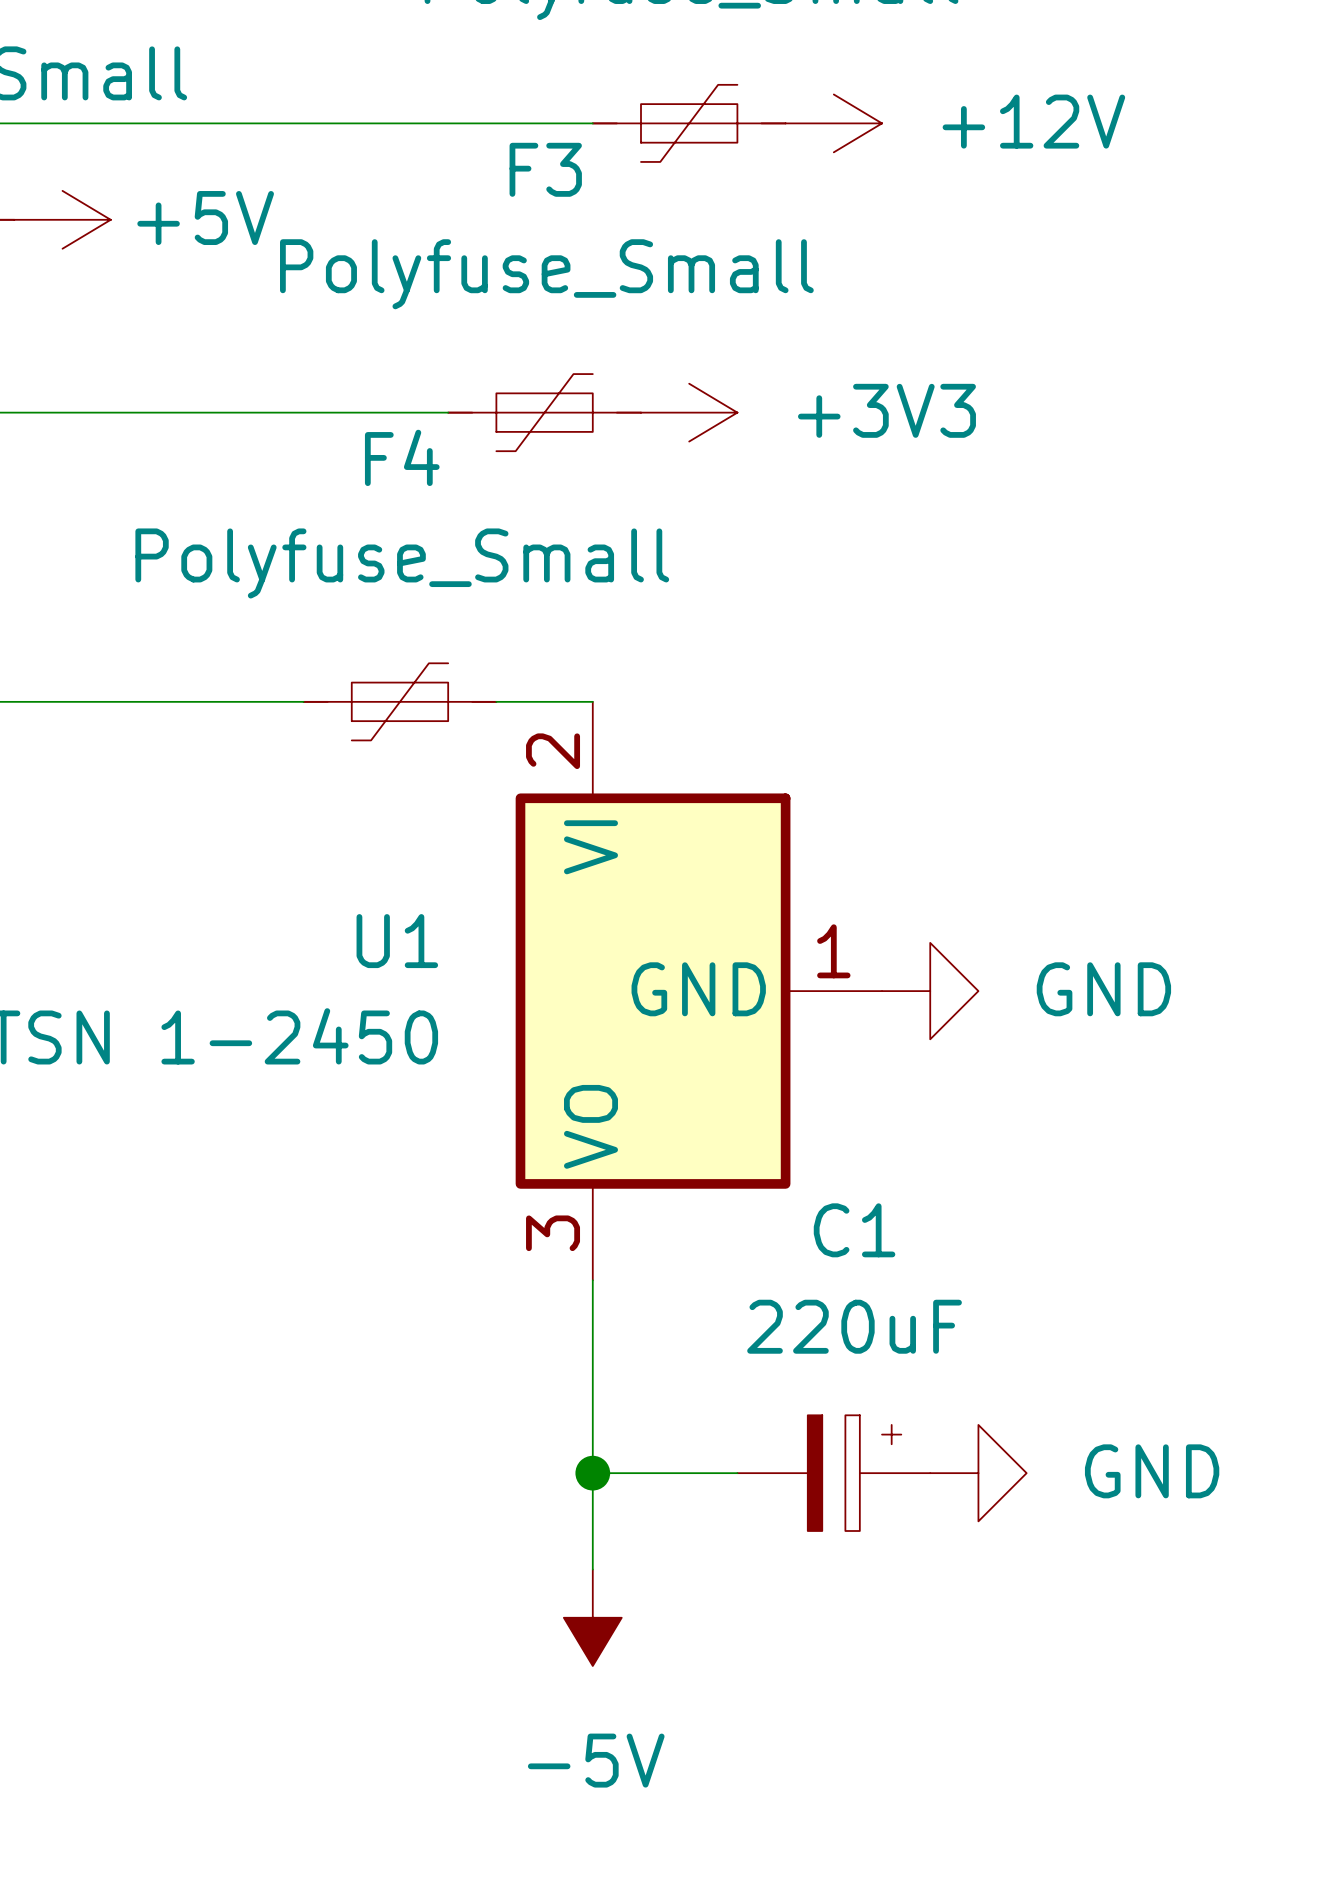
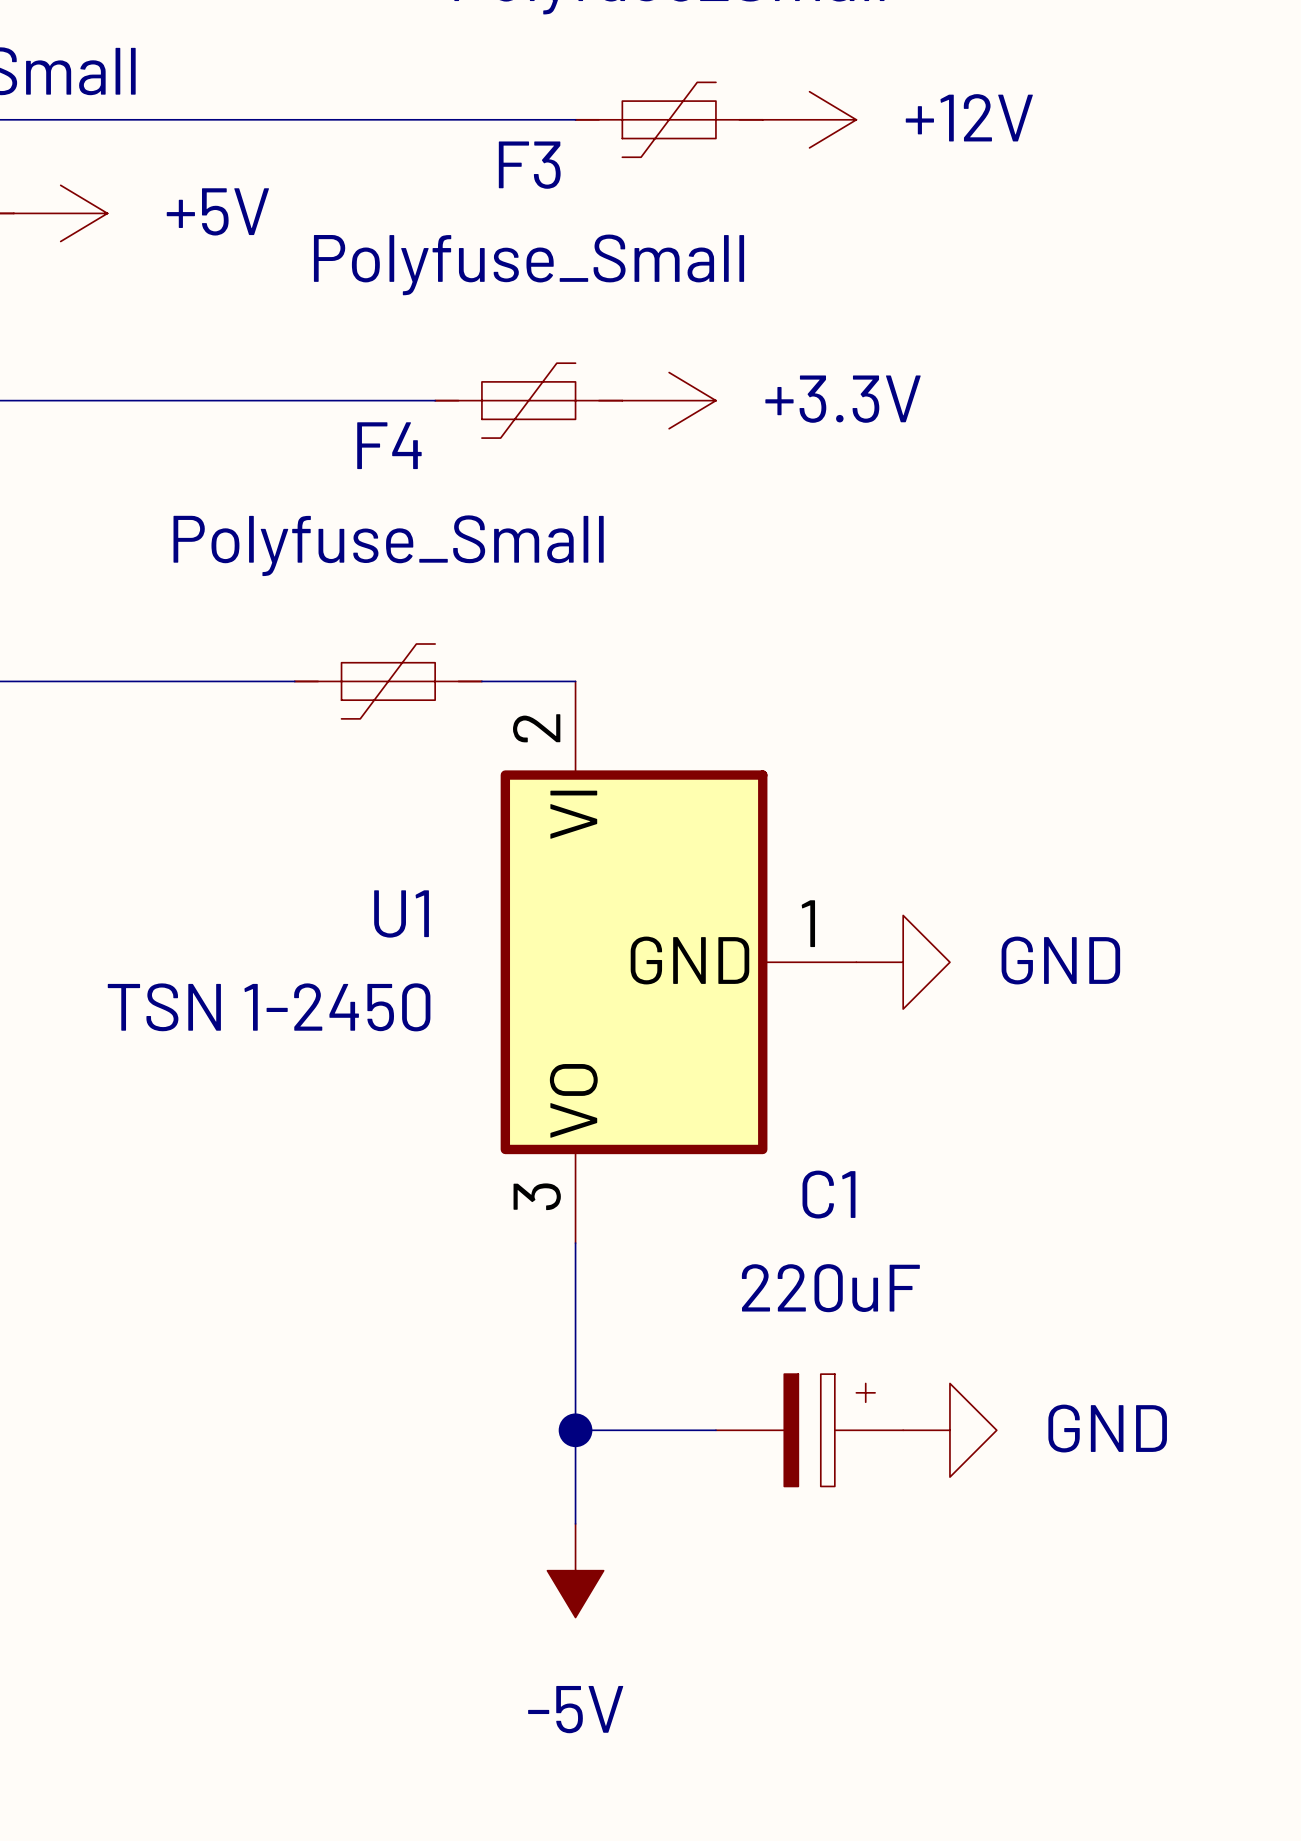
power symbol: +3V3 (689, 412) -> +3.3V (669, 400)

